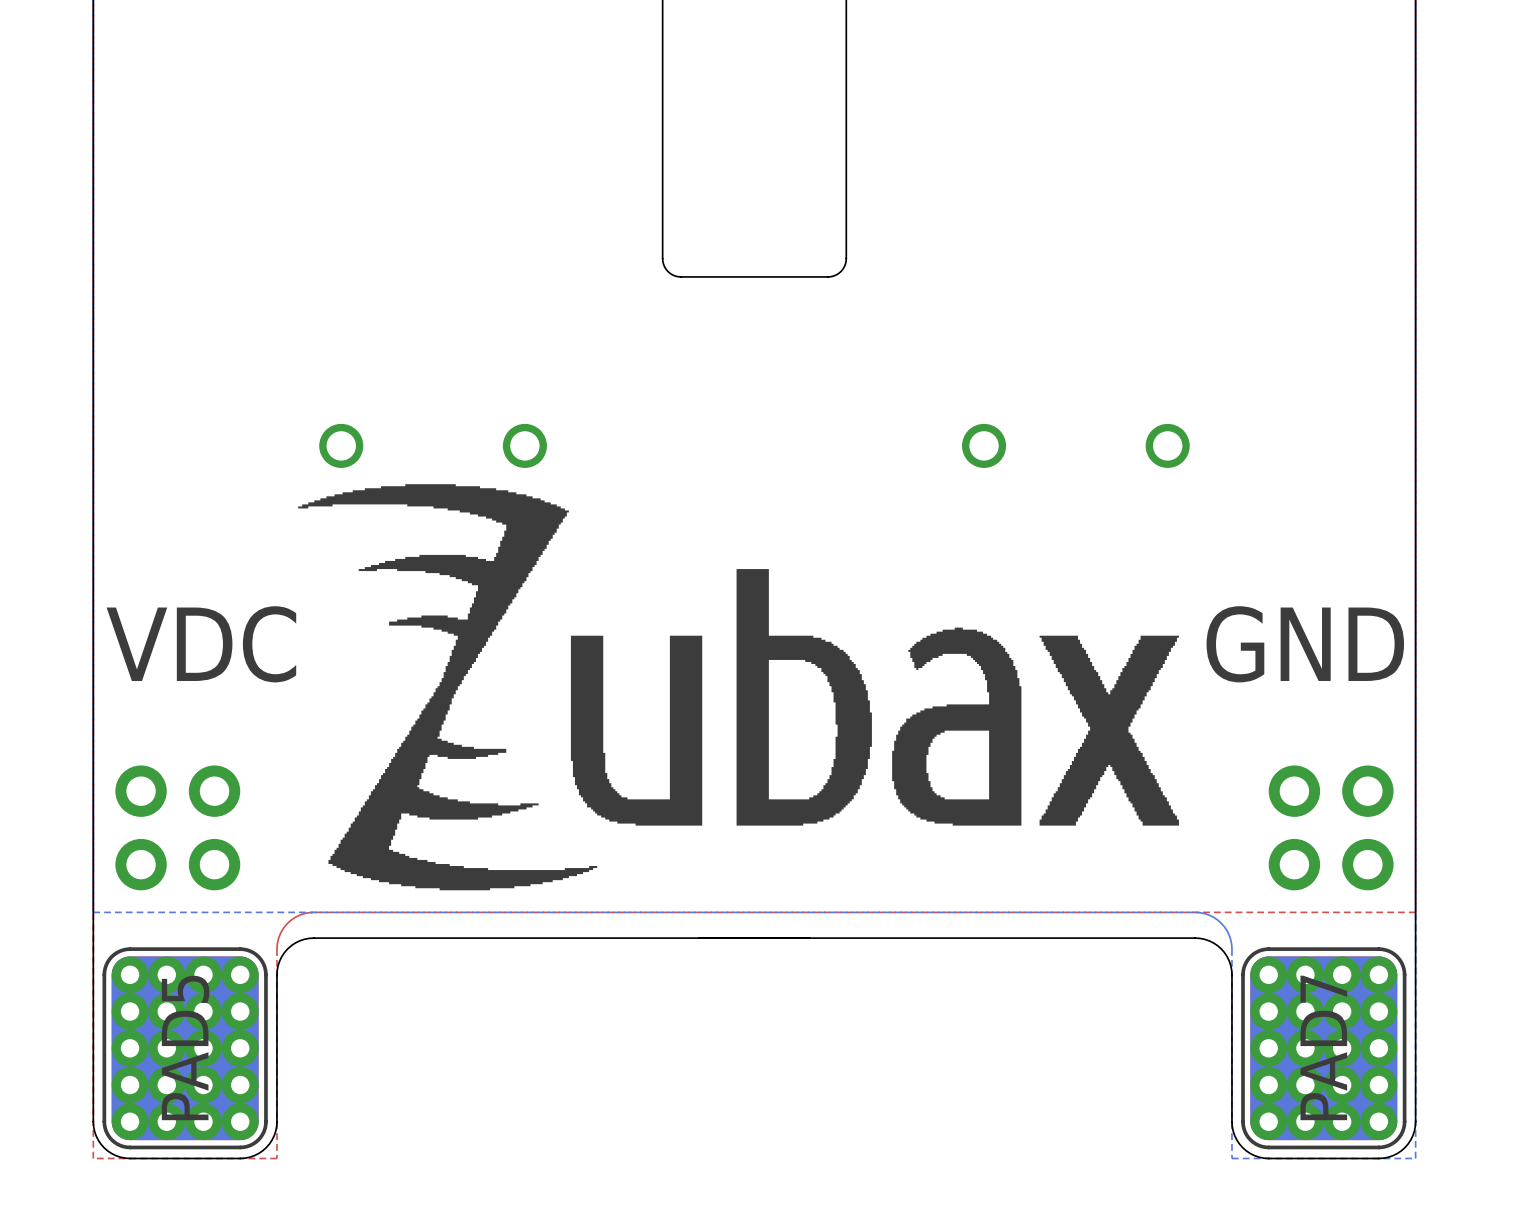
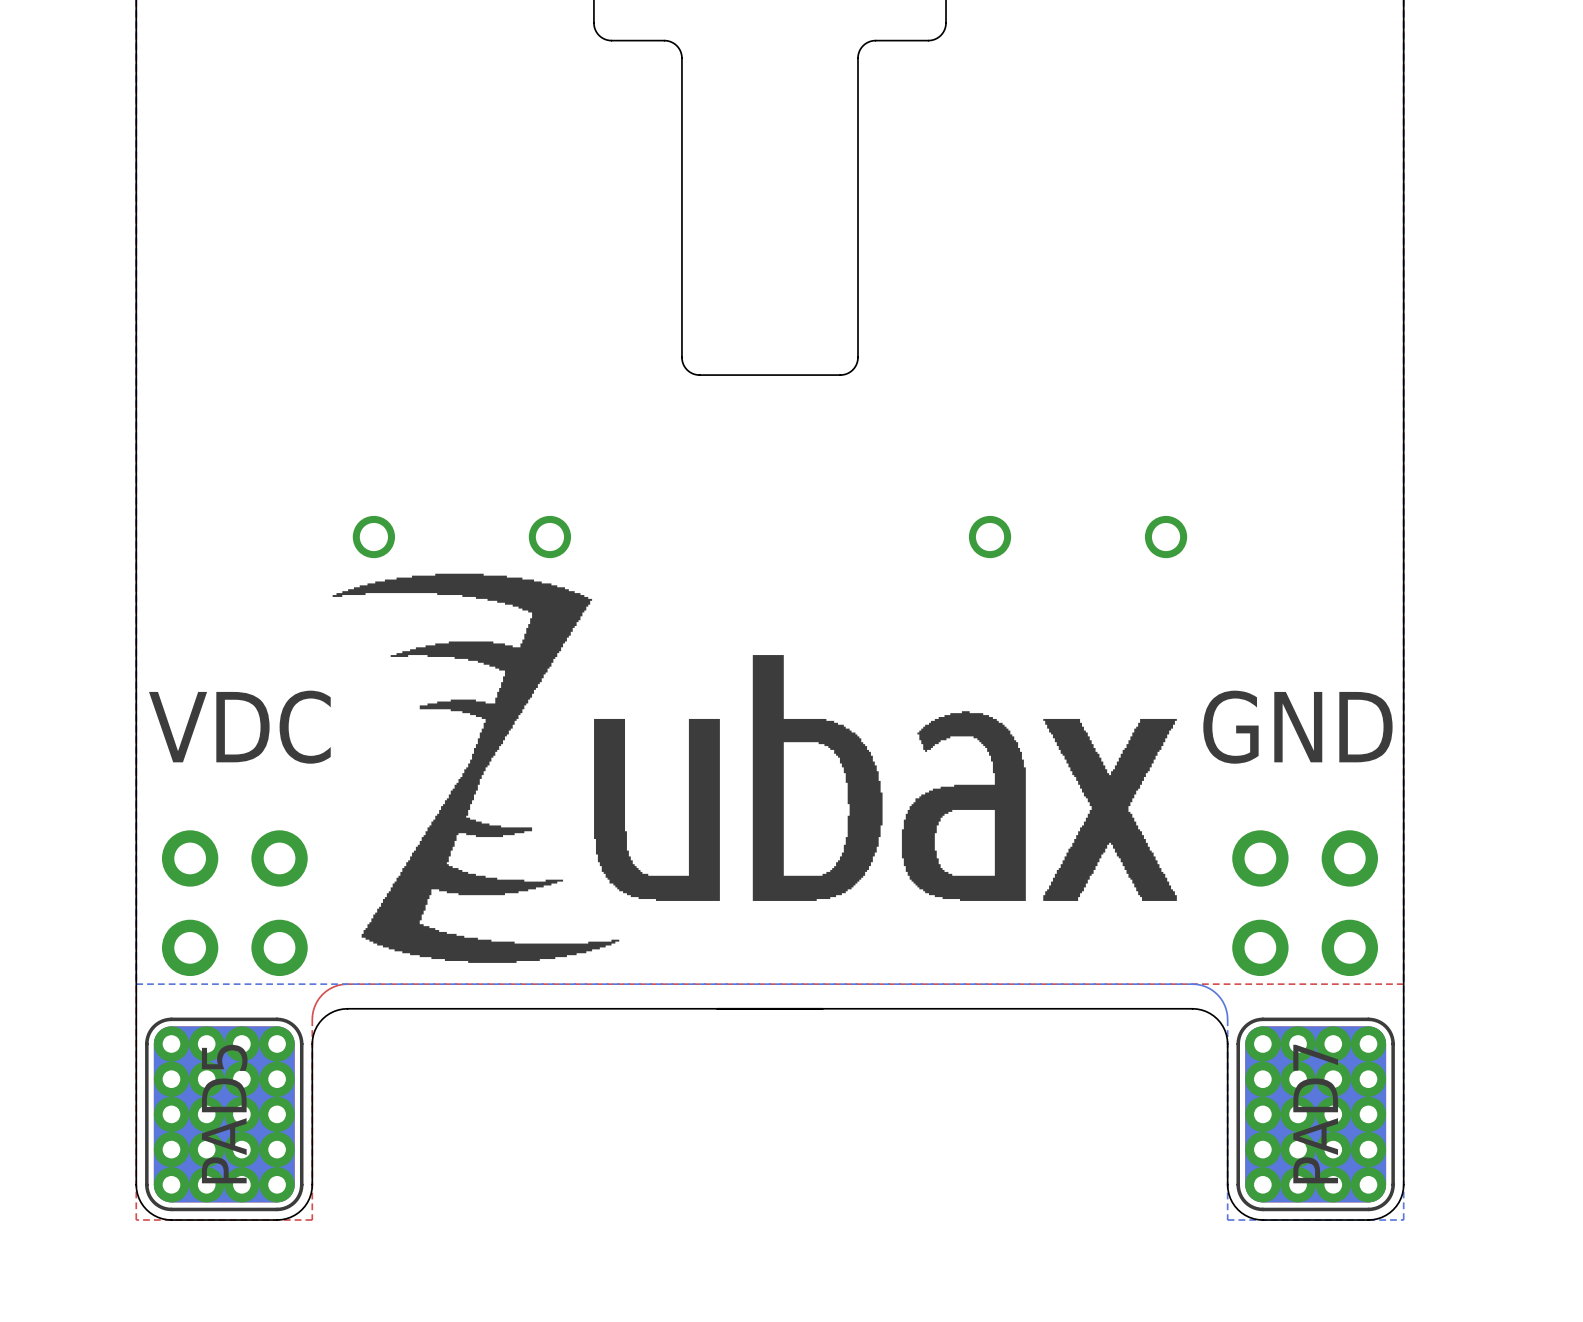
part footprint: [115, 765, 241, 891] -> [161, 830, 308, 977]
part footprint: [1268, 765, 1394, 891] -> [1232, 830, 1378, 977]

